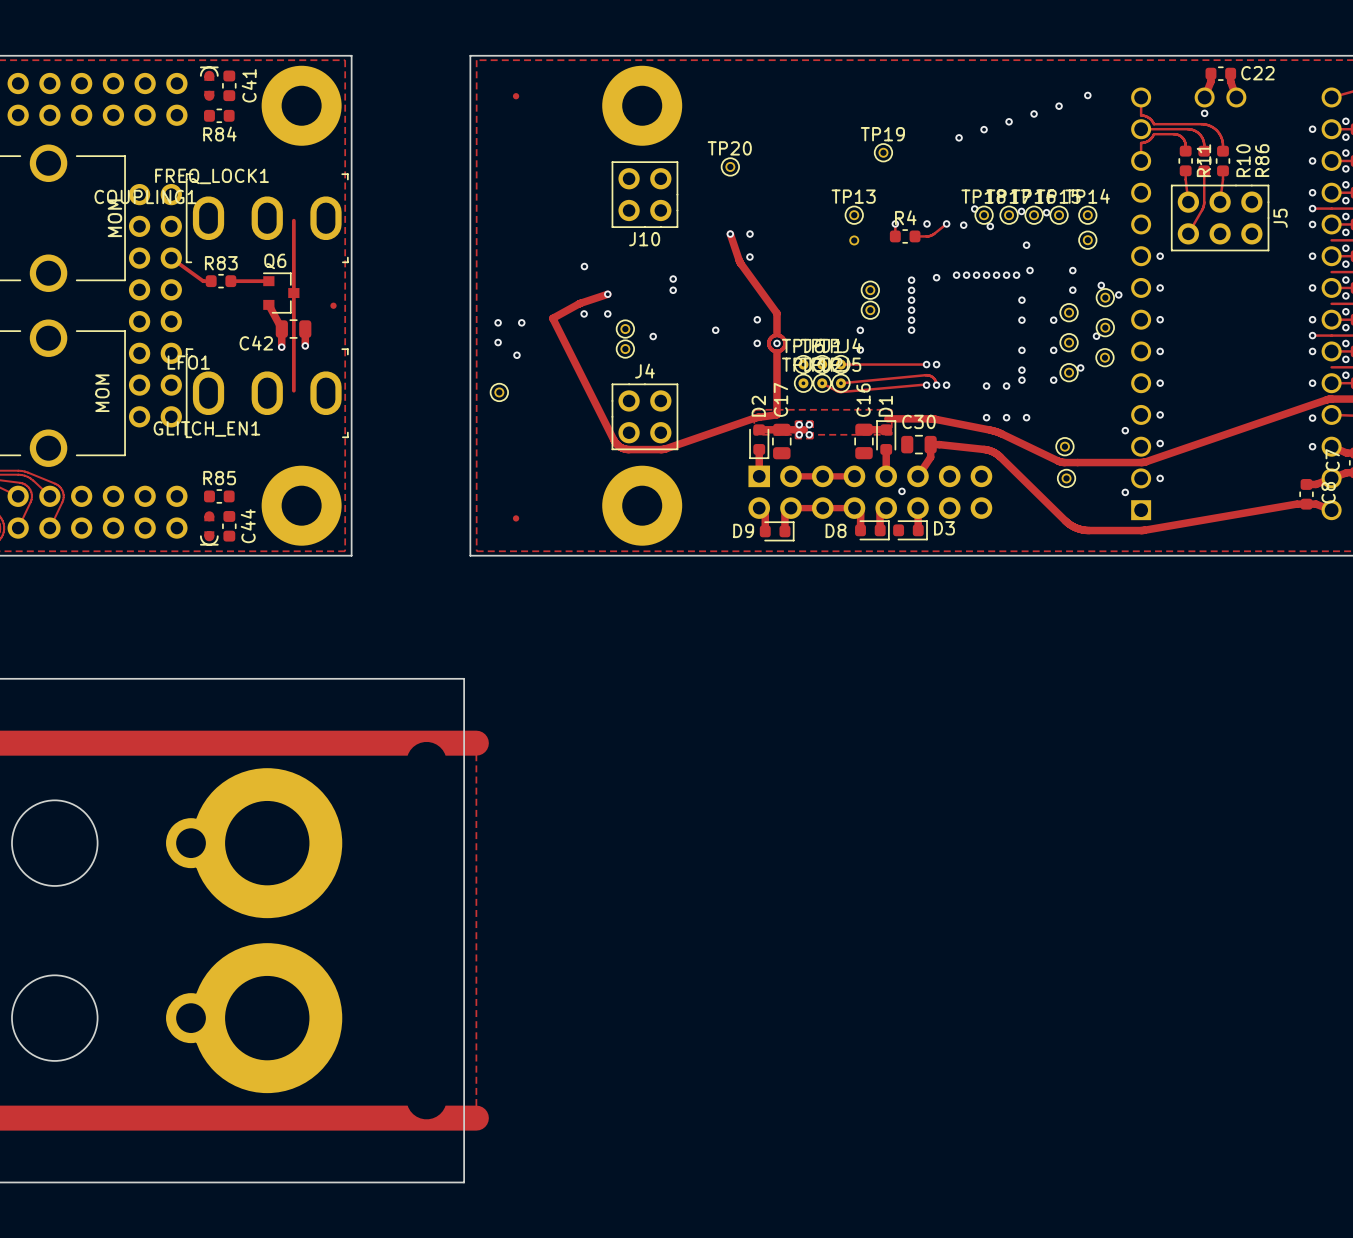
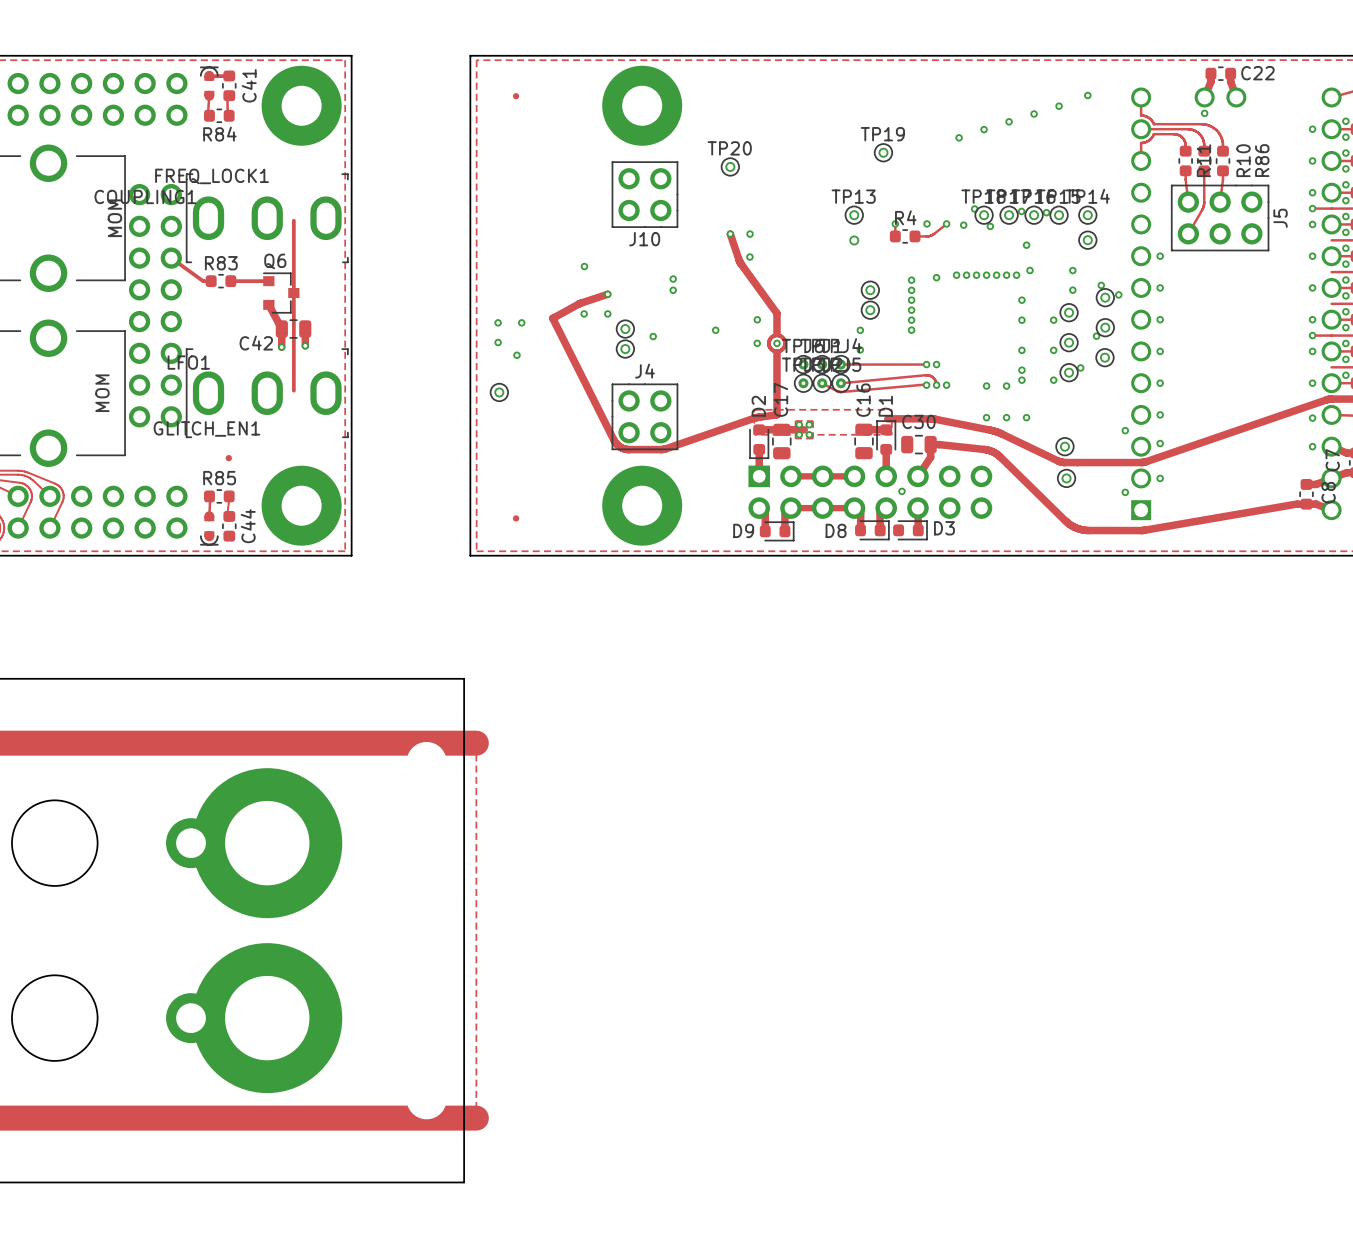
track: none -> (227, 75) (209, 76)
track: none -> (209, 95) (208, 113)
track: none -> (227, 95) (227, 113)
part position: (333, 305) -> (228, 458)
track: none -> (210, 497) (209, 516)
track: none -> (229, 498) (227, 516)

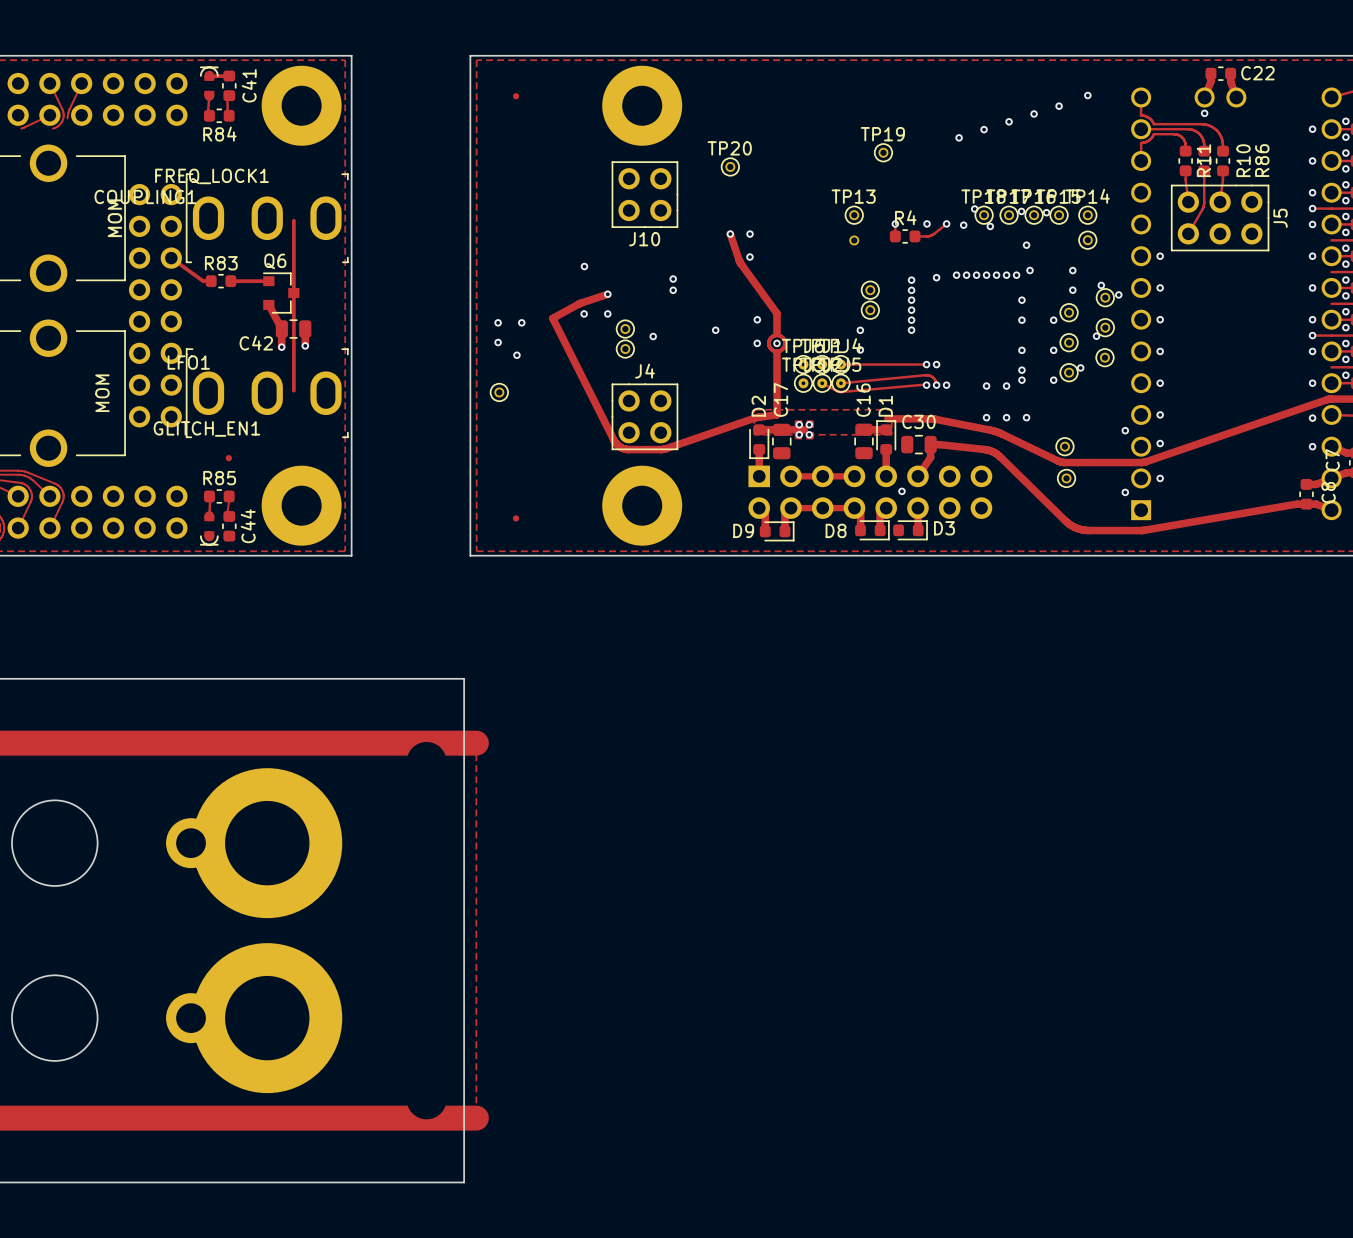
track: none -> (50, 83) (63, 114) (61, 123) (52, 128)
track: none -> (81, 83) (67, 118)
track: none -> (50, 115) (21, 128)

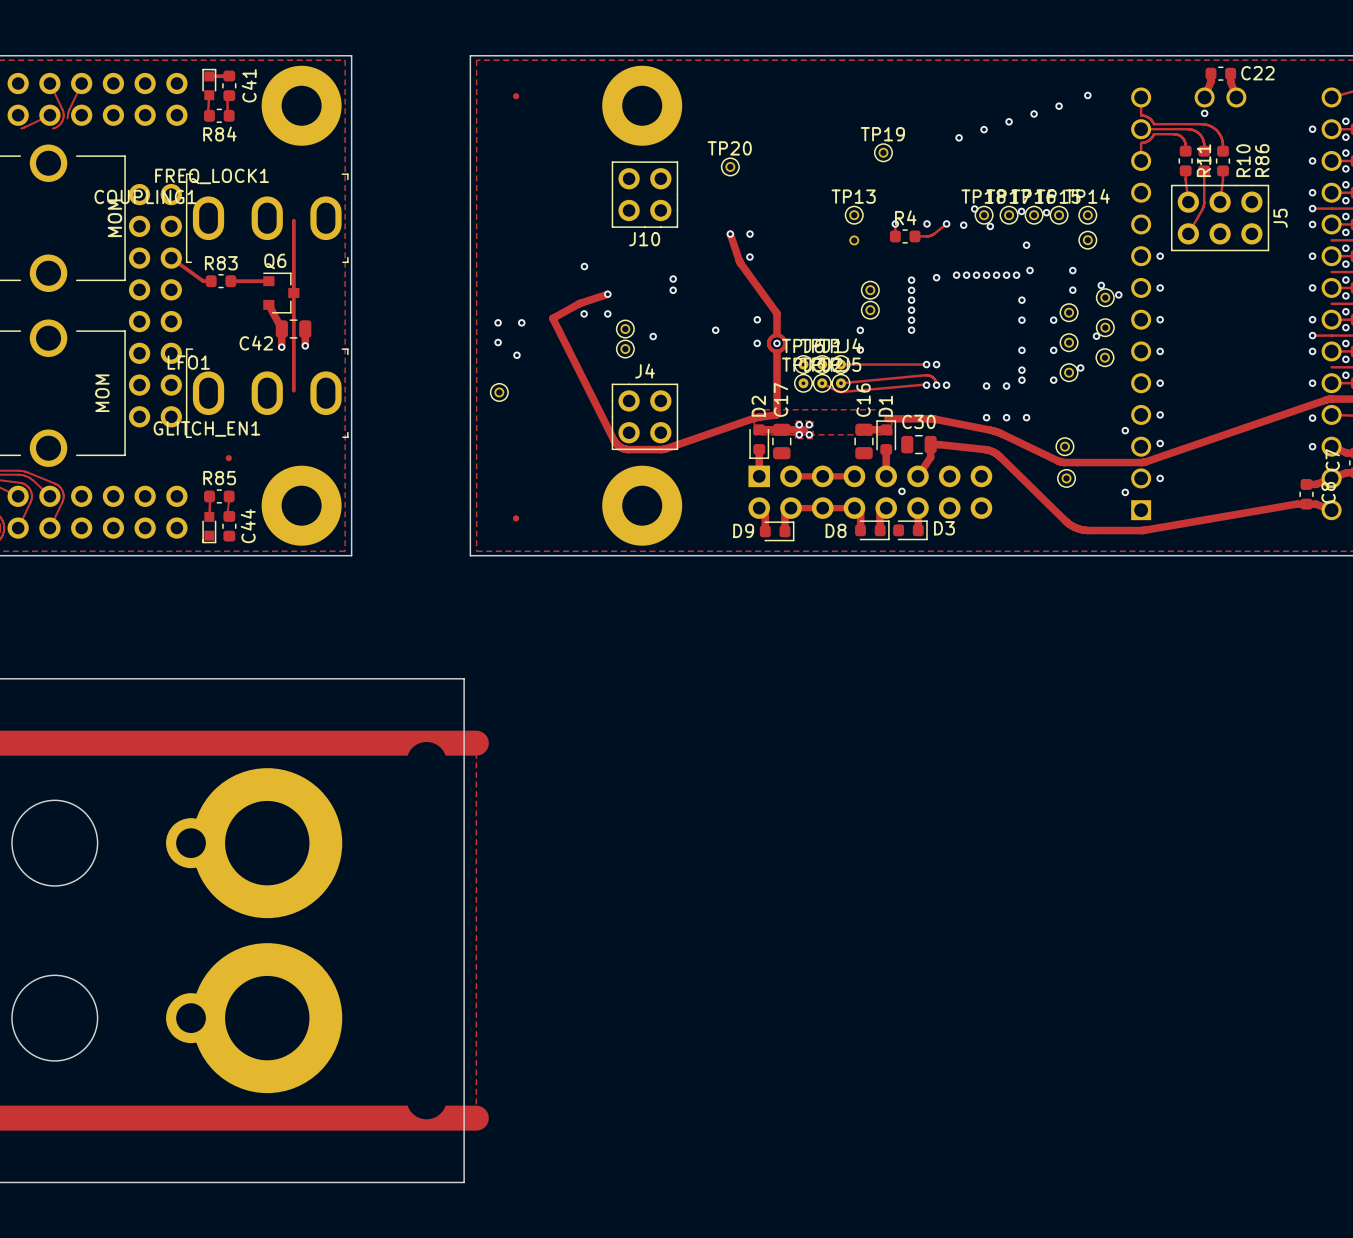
part footprint: [199, 66, 219, 101] -> [202, 68, 217, 101]
part footprint: [199, 511, 219, 546] -> [202, 511, 217, 544]

